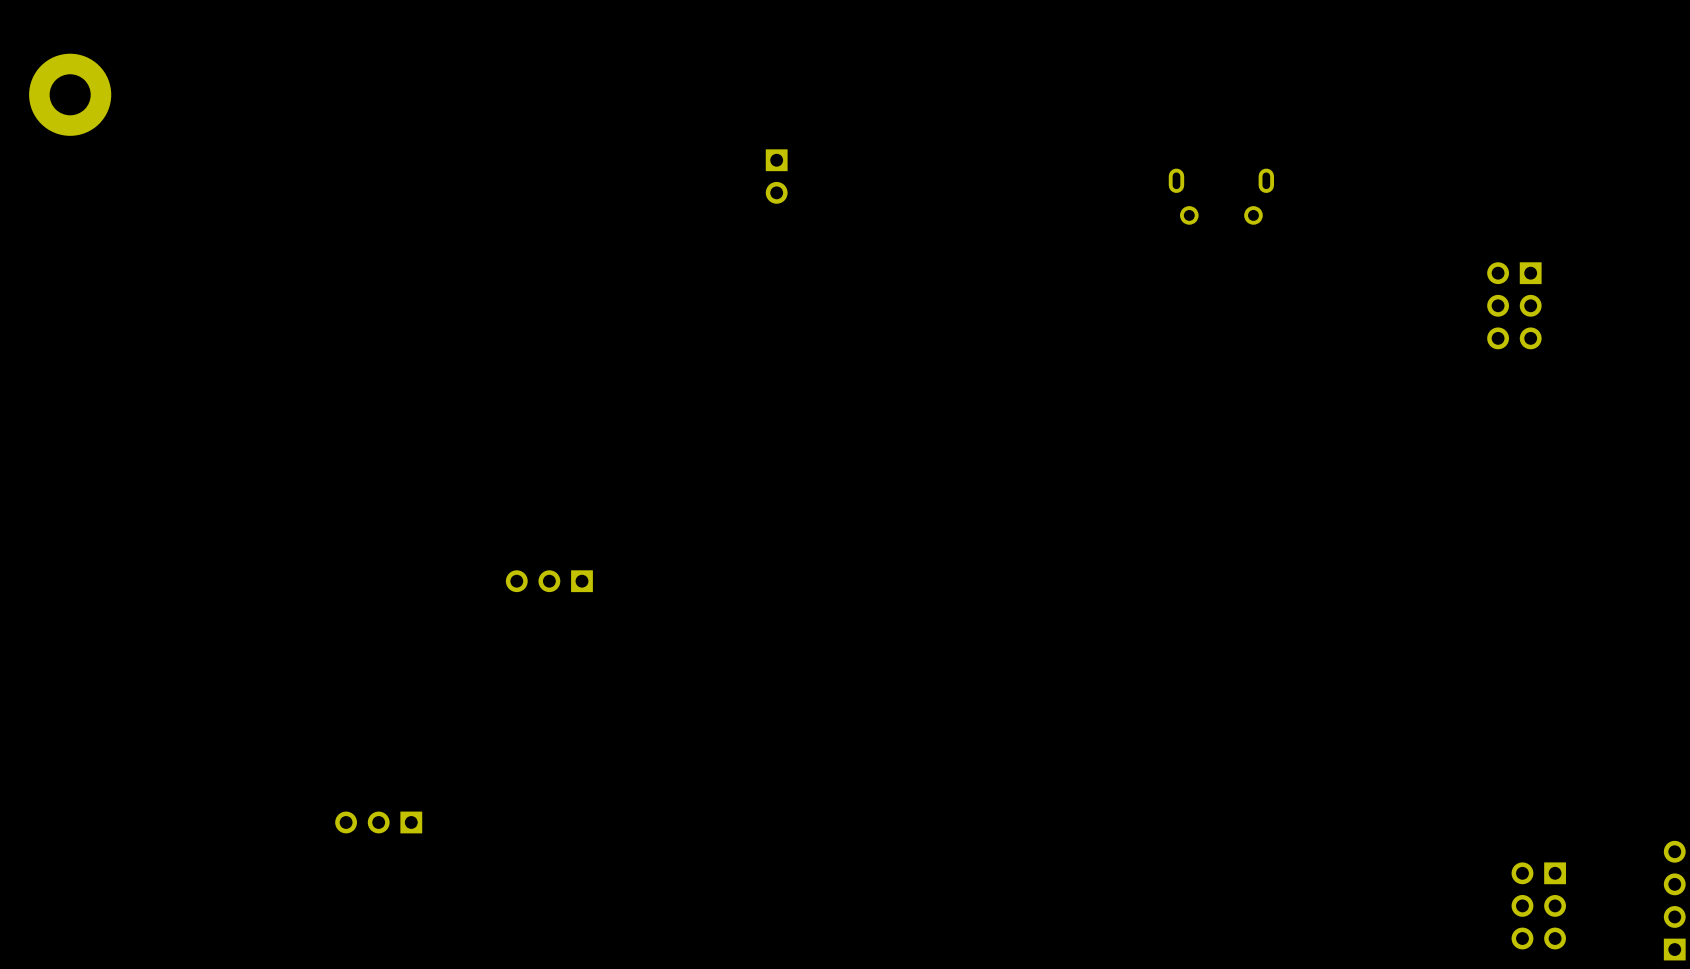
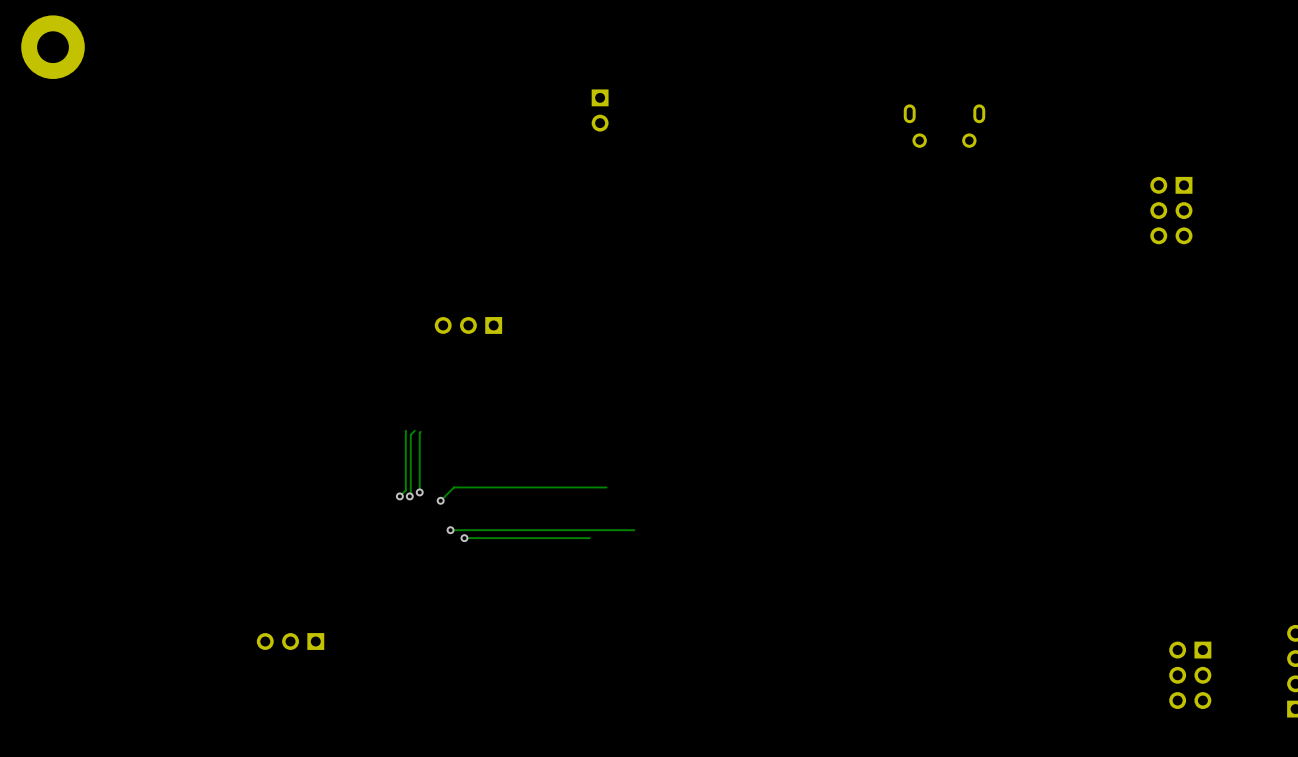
part position: (549, 581) -> (468, 325)
track: none -> (405, 430) (405, 490) (399, 496)
track: none -> (414, 430) (410, 434) (409, 496)
track: none -> (420, 431) (419, 492)
track: none -> (606, 487) (454, 487) (440, 500)
via: none -> (419, 492)
via: none -> (399, 496)
via: none -> (409, 496)
via: none -> (440, 500)
via: none -> (450, 530)
track: none -> (634, 530) (450, 530)
via: none -> (464, 538)
track: none -> (589, 538) (464, 538)
part position: (378, 822) -> (290, 641)

